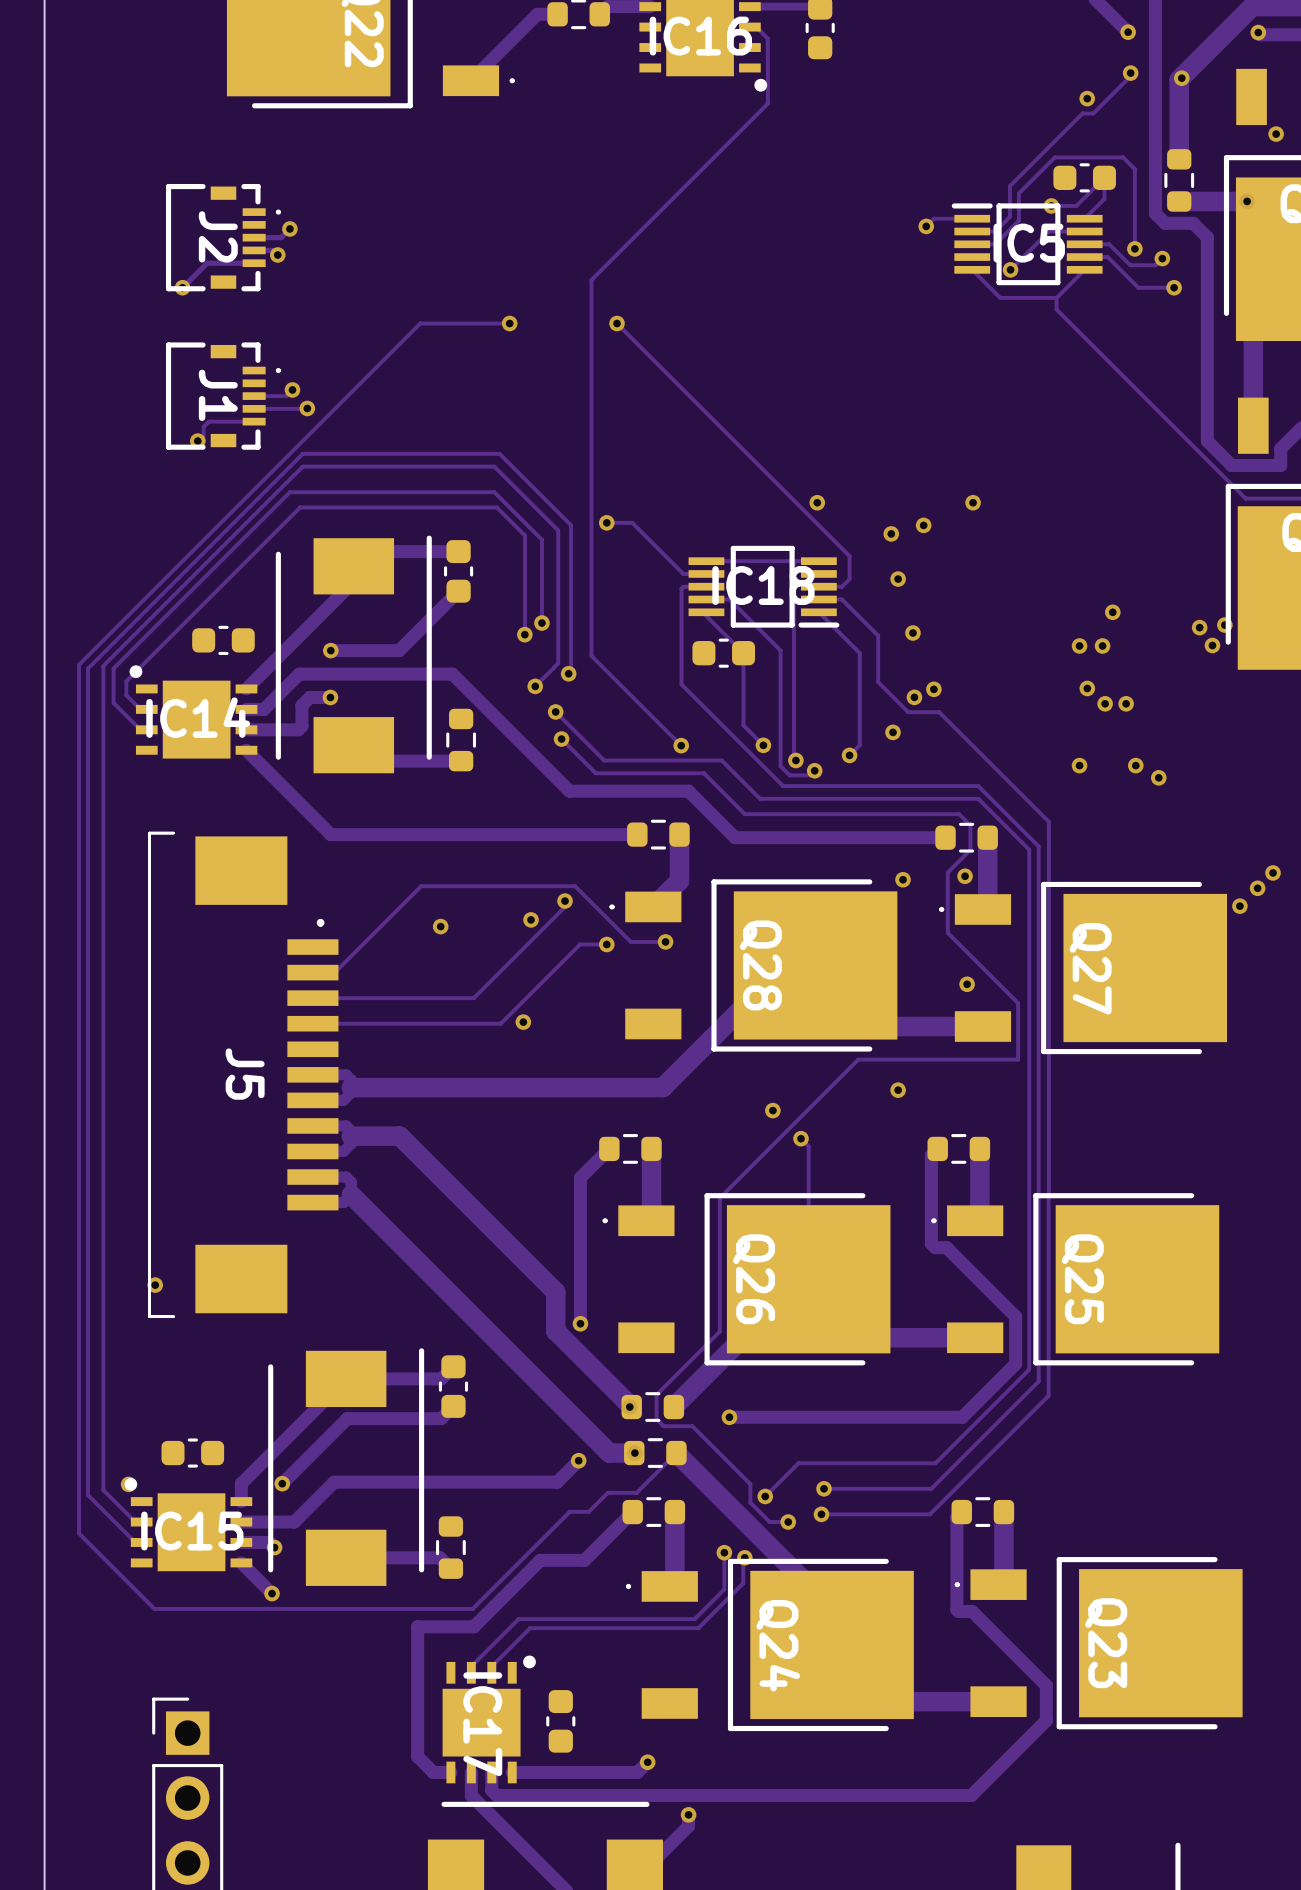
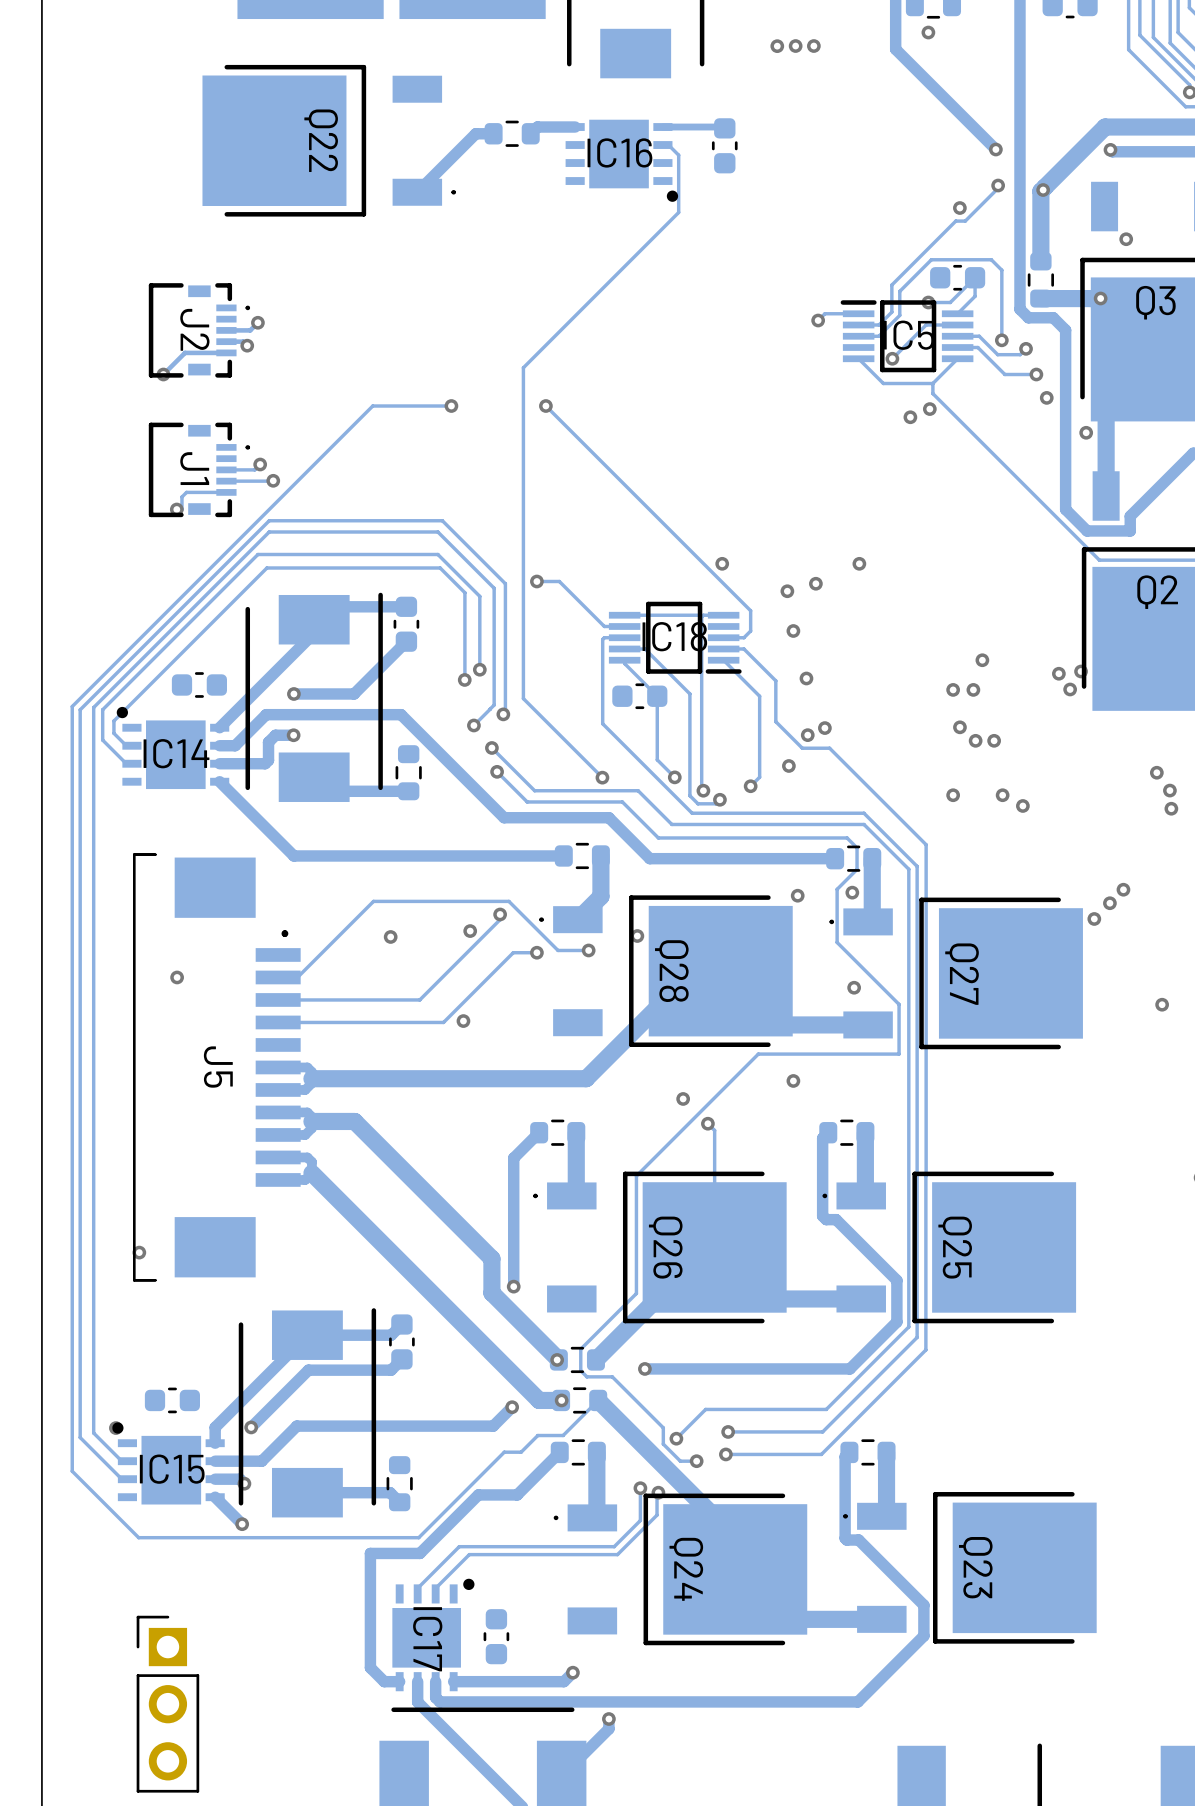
via: none -> (1046, 397)
via: none -> (929, 409)
via: none -> (910, 417)
via: none -> (1086, 432)
via: none -> (637, 936)
via: none -> (177, 977)

